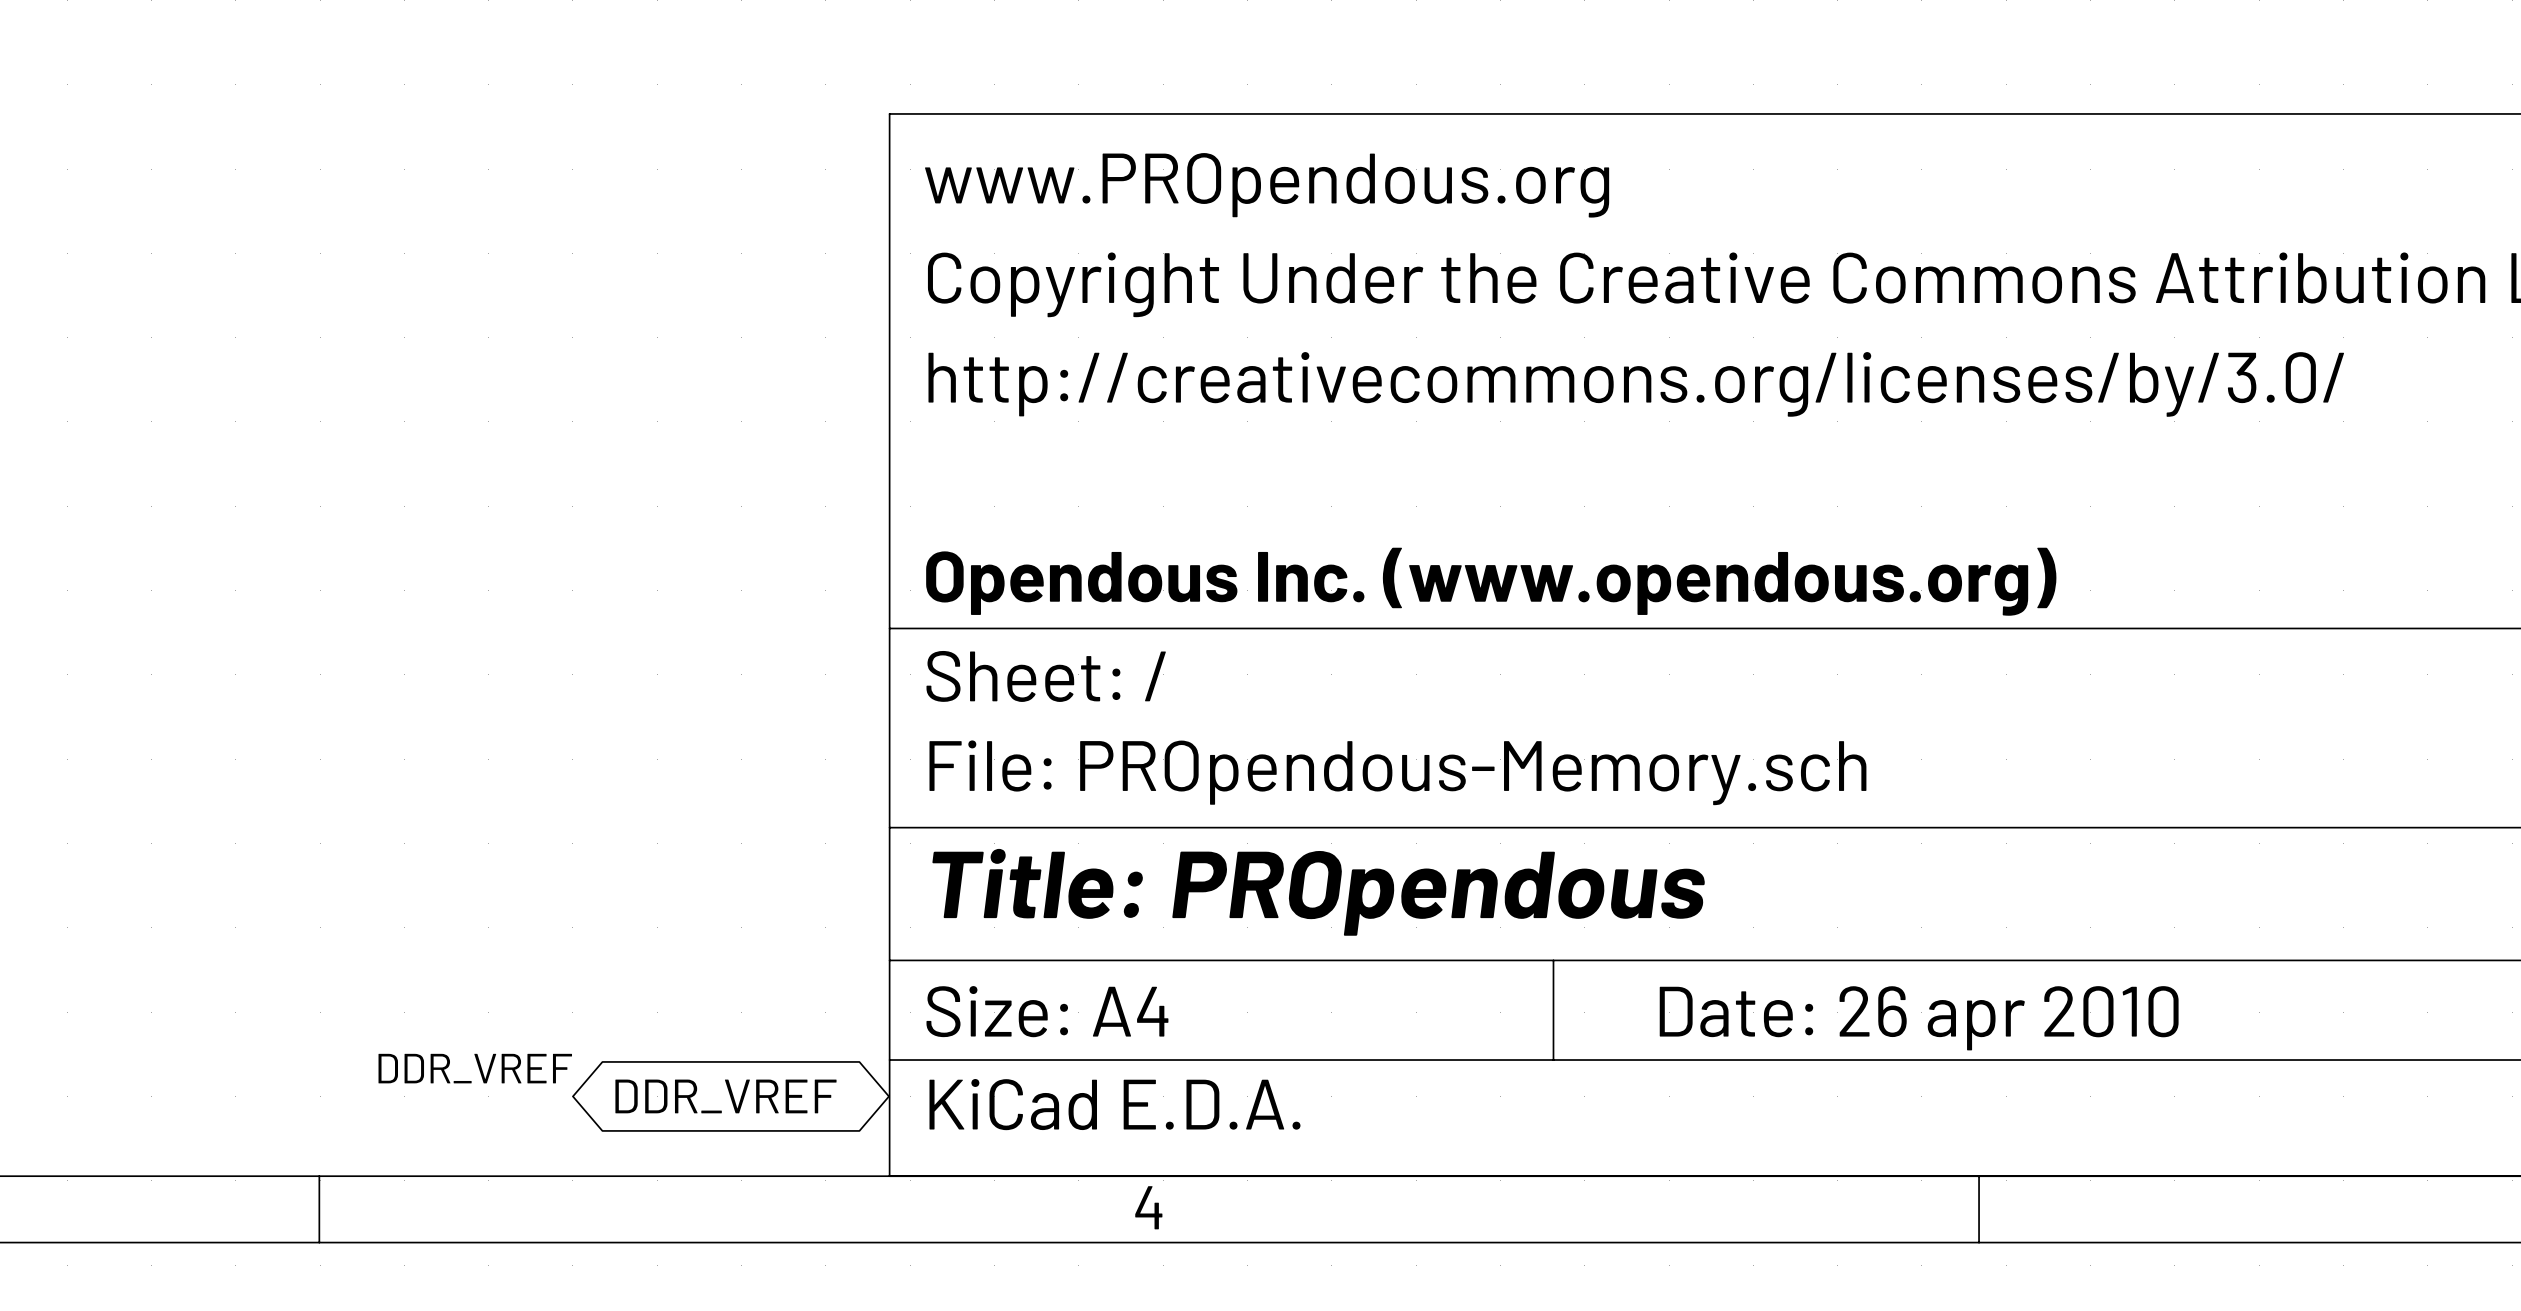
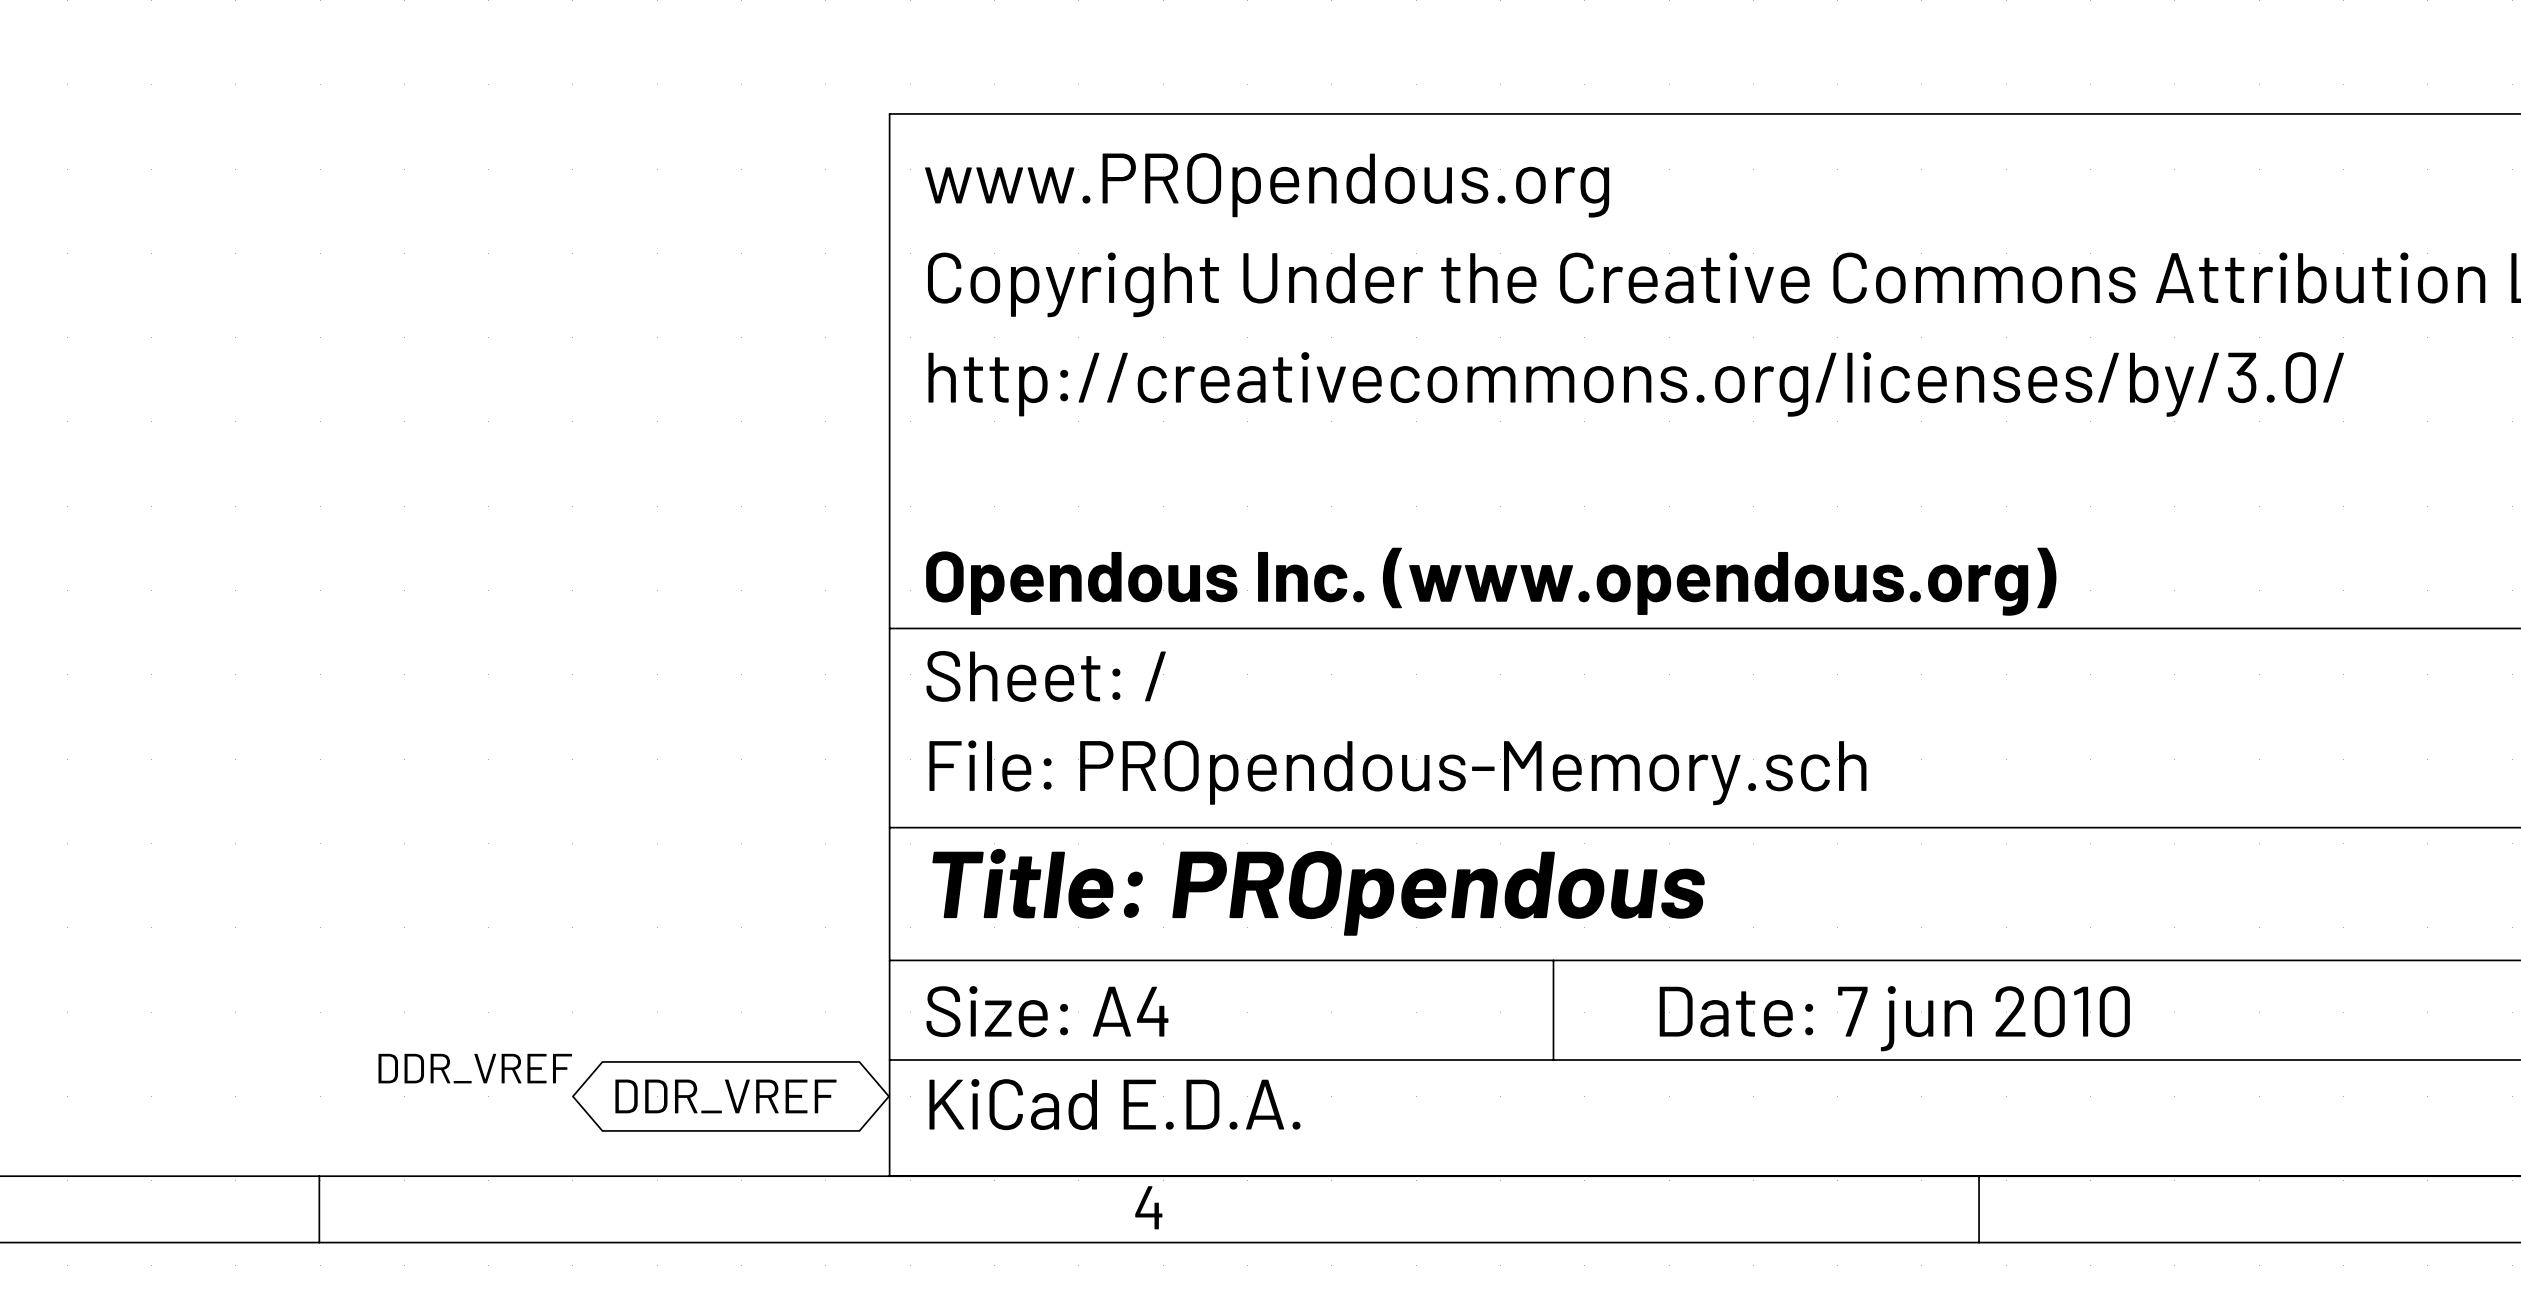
title block: Date: 26 apr 2010 (1919, 1018) -> Date: 7 jun 2010 (1894, 1018)

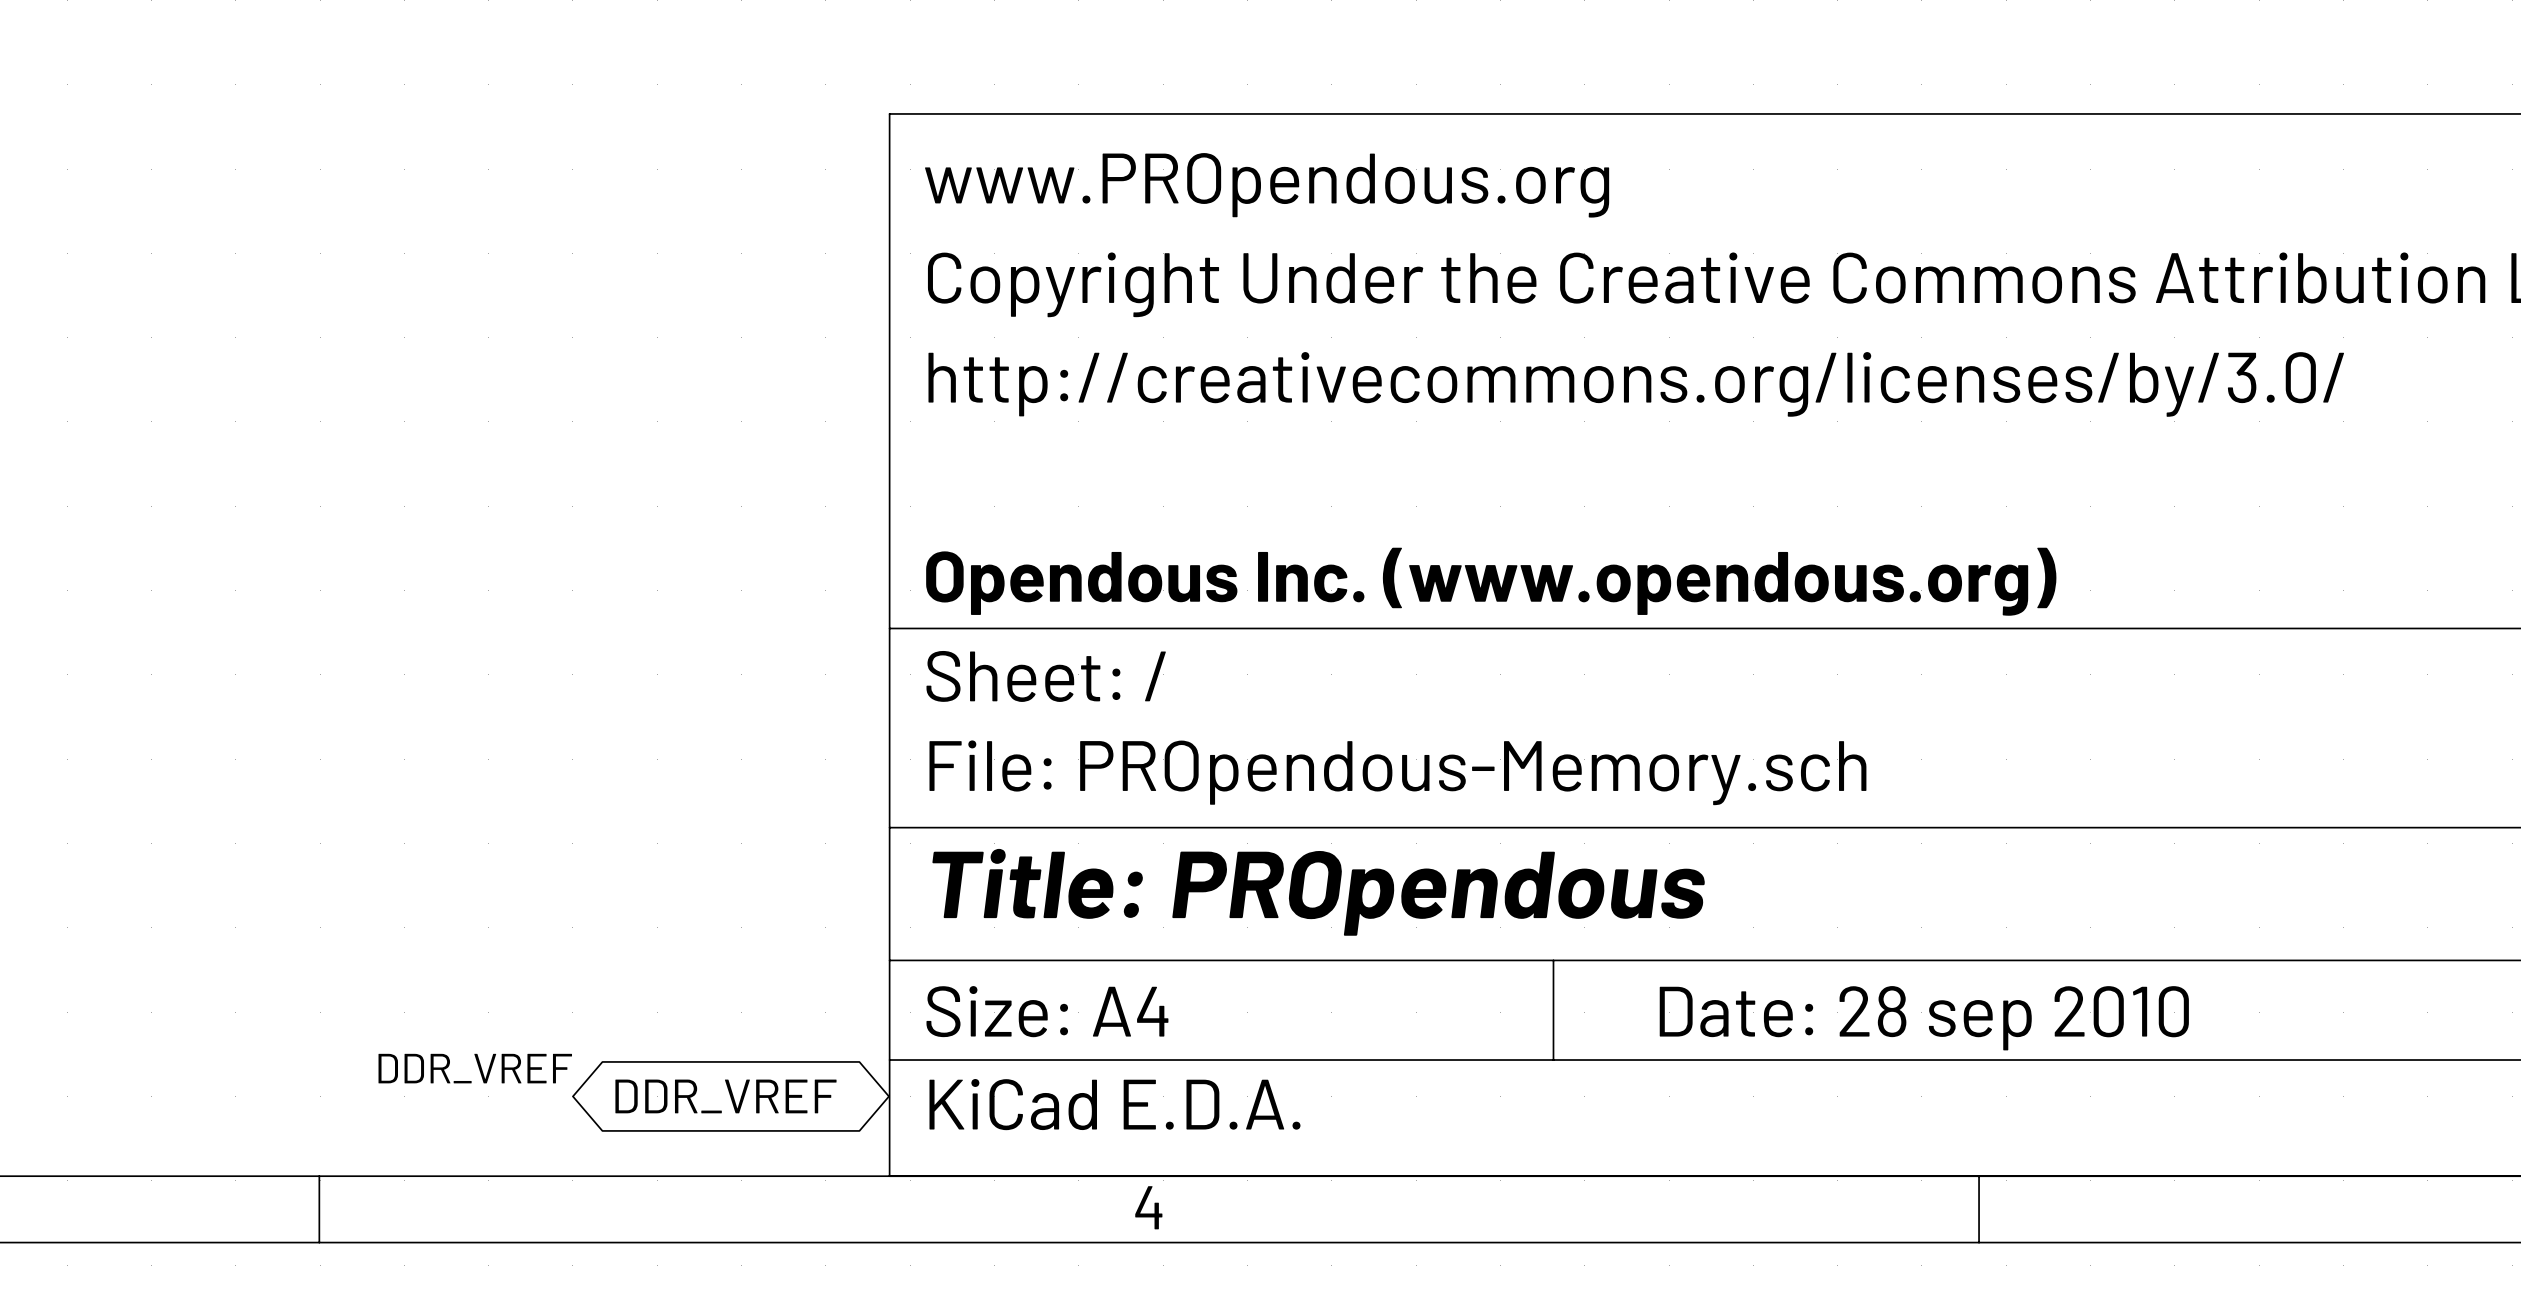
title block: Date: 7 jun 2010 (1894, 1018) -> Date: 28 sep 2010 (1924, 1018)

